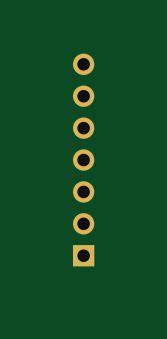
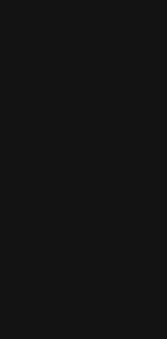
part: (83, 160) -> none

